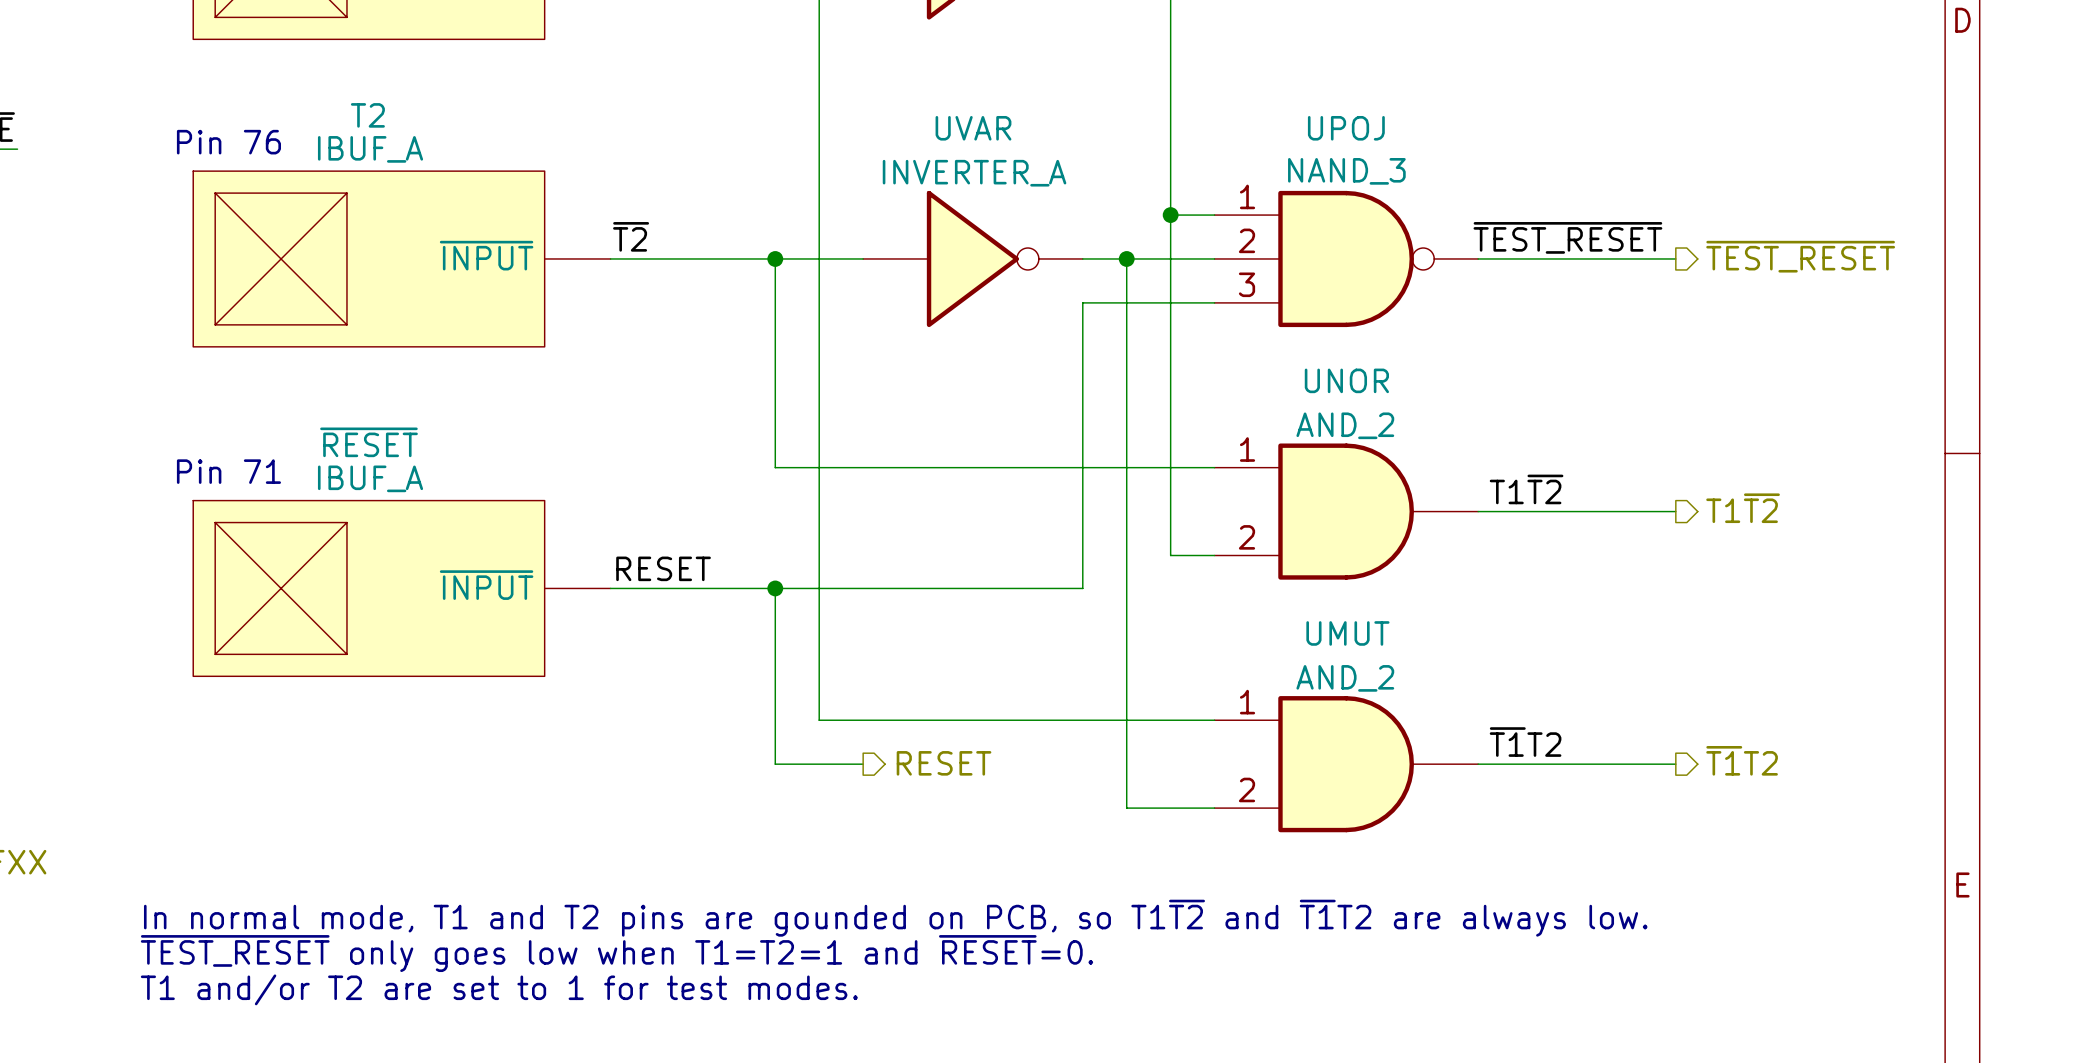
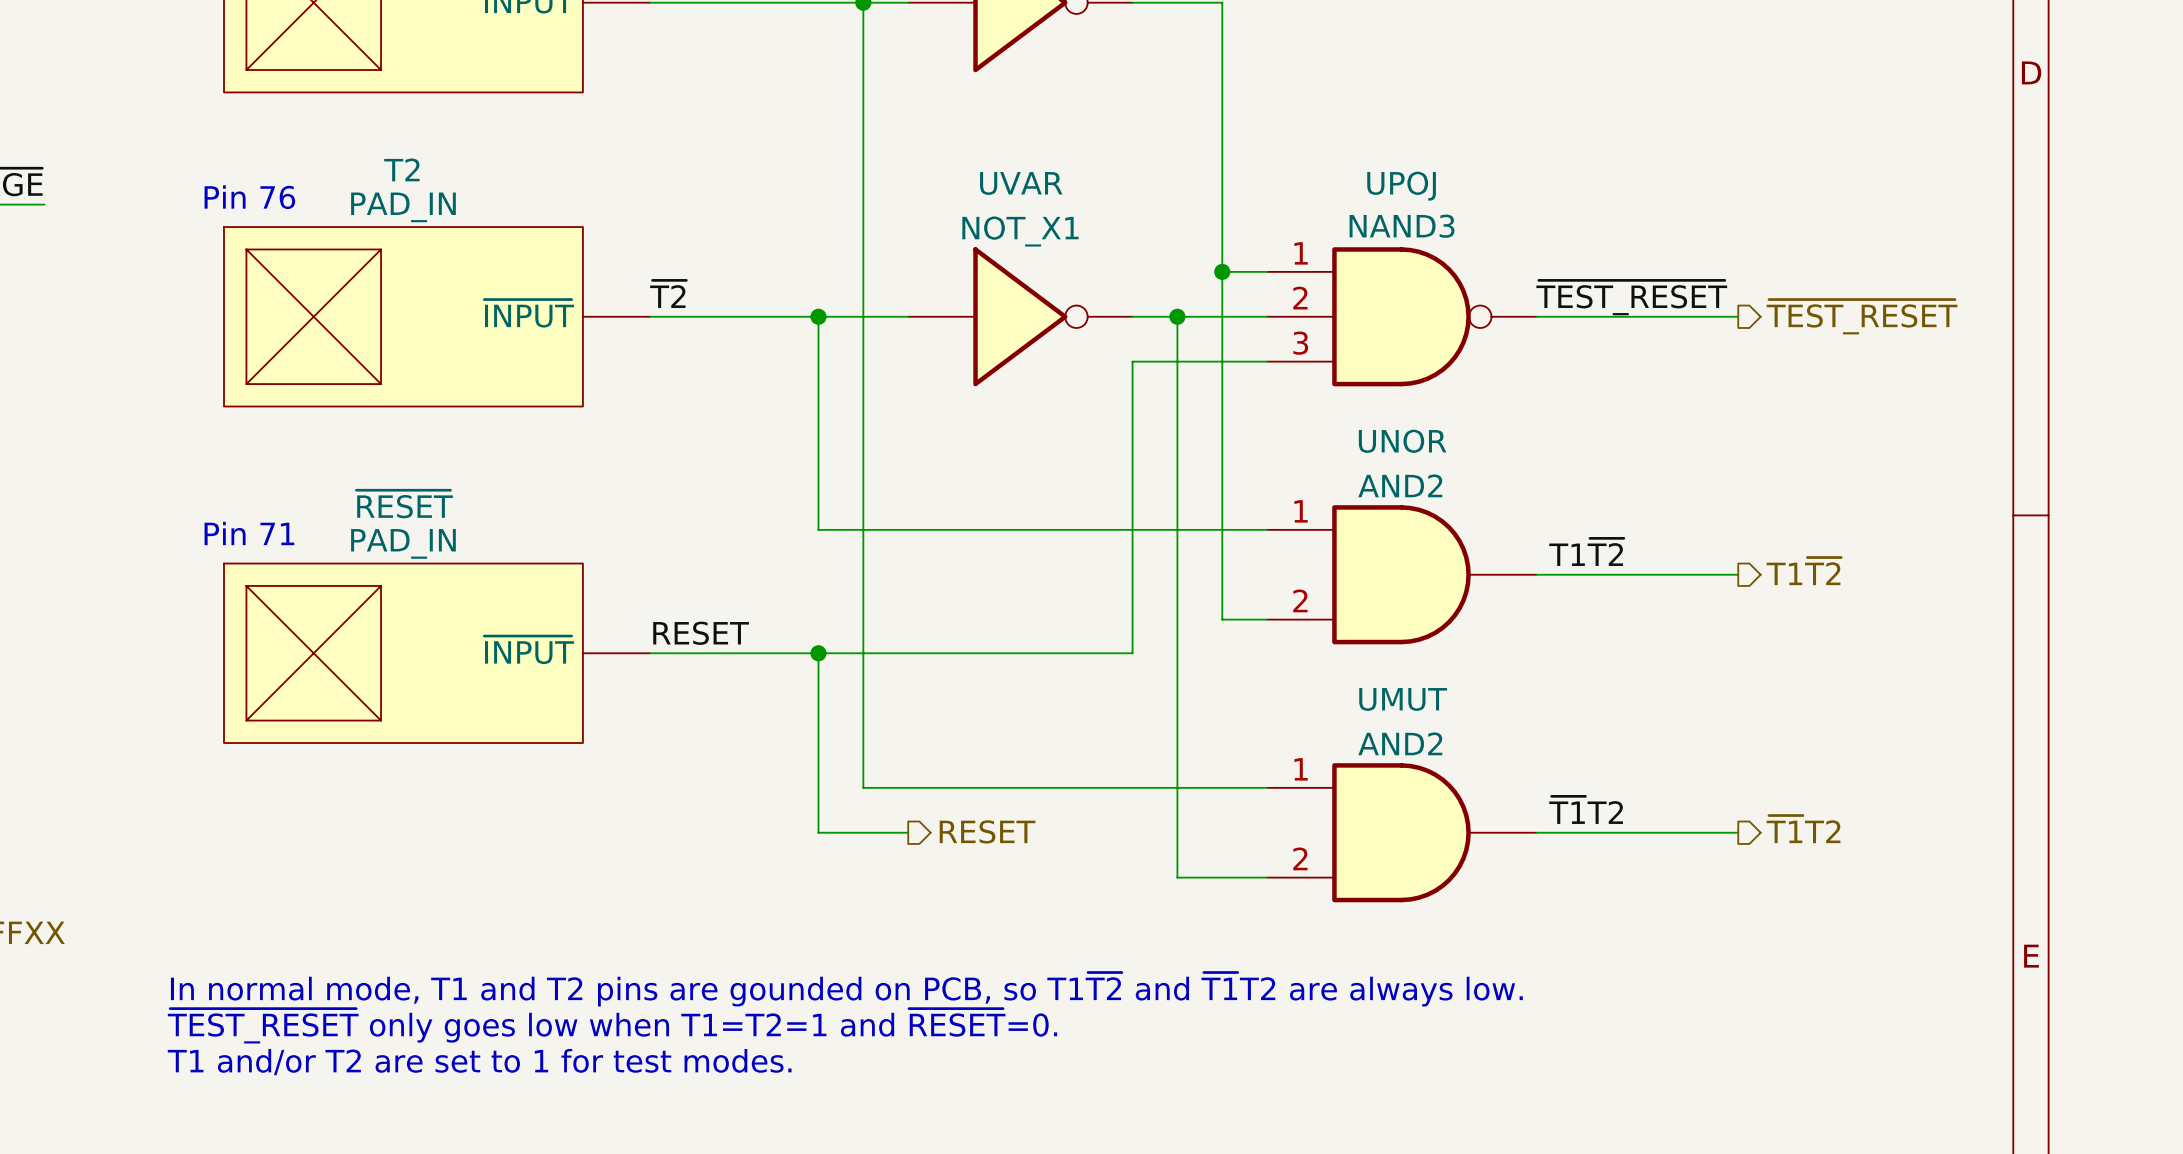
T2 value: IBUF_A (370, 149) -> PAD_IN (403, 207)
UPOJ value: NAND_3 (1346, 171) -> NAND3 (1402, 226)
UVAR value: INVERTER_A (974, 173) -> NOT_X1 (1020, 231)
UNOR value: AND_2 (1345, 425) -> AND2 (1400, 485)
~{RESET} value: IBUF_A (370, 478) -> PAD_IN (403, 543)
UMUT value: AND_2 (1345, 678) -> AND2 (1400, 743)

